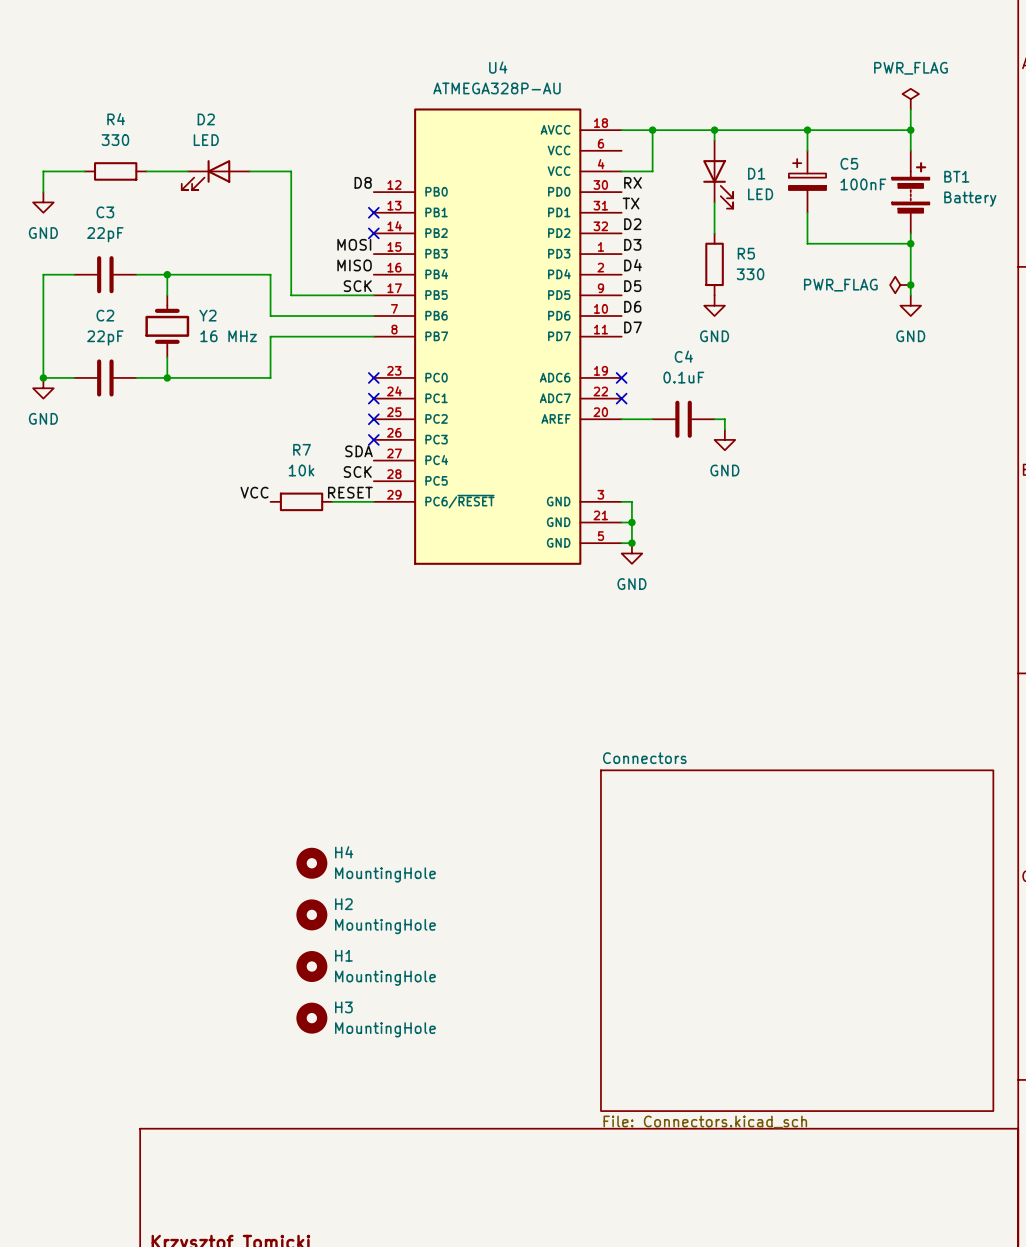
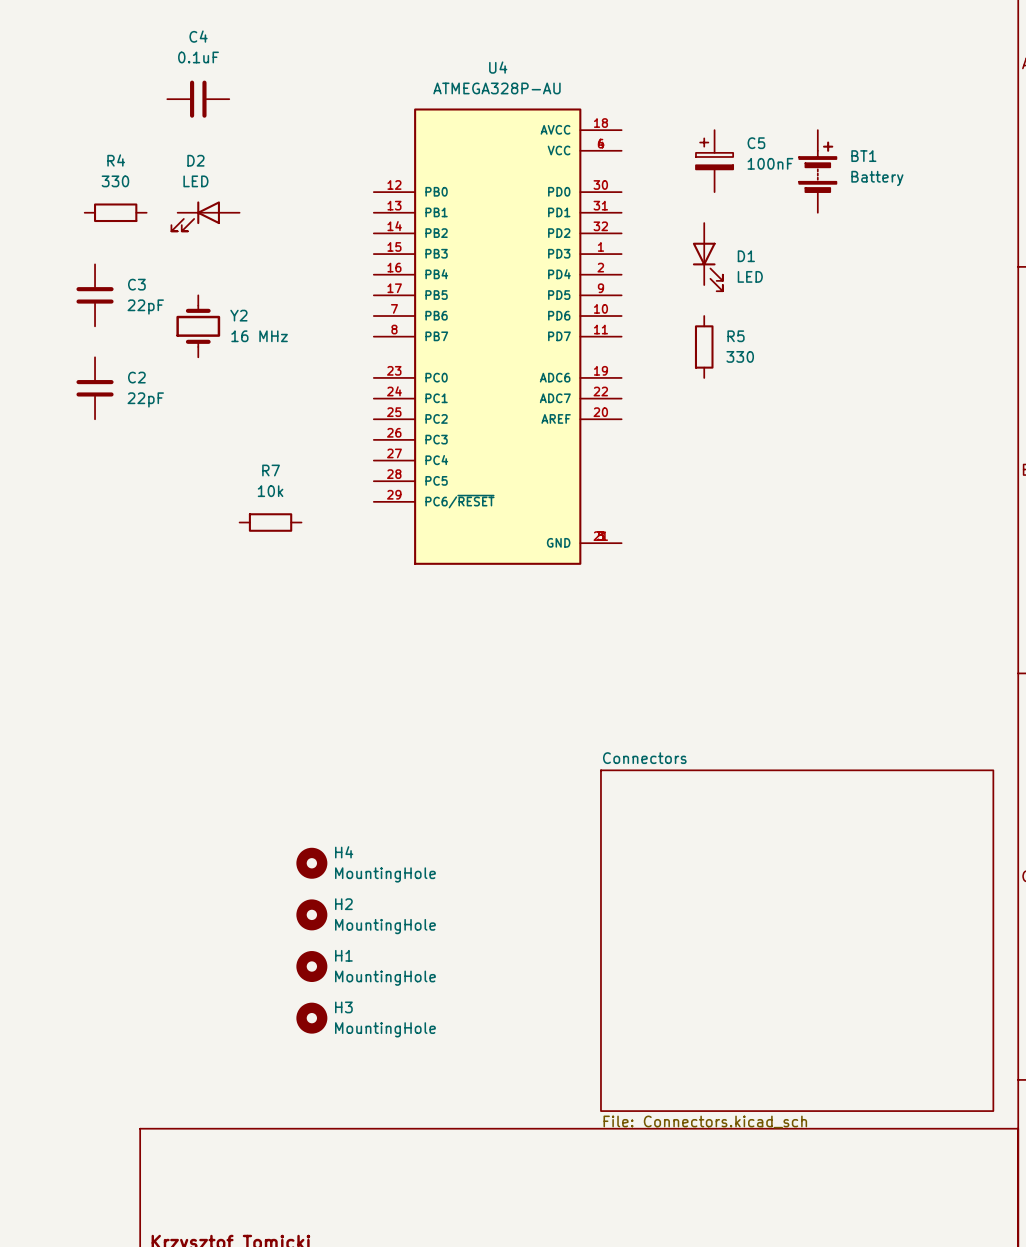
power symbol: PWR_FLAG (910, 99) -> none
U4 symbol: [373, 108, 622, 565] -> [373, 108, 622, 565]
wire: (910, 109) (910, 150) -> none
wire: (621, 130) (910, 130) -> none
wire: (652, 130) (652, 171) (621, 171) -> none
junction: (652, 130) -> none
junction: (714, 130) -> none
wire: (807, 130) (807, 150) -> none
junction: (807, 130) -> none
junction: (910, 130) -> none
wire: (84, 171) (43, 171) (43, 192) -> none
R4 position: (115, 171) -> (115, 212)
wire: (146, 171) (187, 171) -> none
wire: (249, 171) (291, 171) (291, 295) (373, 295) -> none
D1 position: (718, 174) -> (707, 257)
D2 position: (215, 175) -> (205, 216)
C5 position: (807, 181) -> (714, 161)
label: D8 (363, 182) -> none
label: RX (633, 182) -> none
BT1 position: (910, 192) -> (817, 171)
power symbol: GND (43, 202) -> none
wire: (714, 202) (714, 233) -> none
label: TX (631, 203) -> none
C3 name position: C3 (105, 212) -> C3 (136, 284)
no-connect mark: (373, 212) -> none
wire: (807, 212) (807, 243) (910, 243) -> none
label: D2 (632, 224) -> none
no-connect mark: (373, 233) -> none
wire: (910, 233) (910, 295) -> none
junction: (910, 243) -> none
label: MOSI (354, 244) -> none
label: D3 (632, 244) -> none
R5 position: (714, 264) -> (704, 346)
label: MISO (354, 265) -> none
label: D4 (633, 265) -> none
wire: (74, 274) (43, 274) (43, 377) (74, 377) -> none
C3 rotation: 0° (105, 274) -> 90° clockwise (95, 295)
wire: (136, 274) (270, 274) (270, 316) (373, 316) -> none
wire: (167, 274) (167, 295) -> none
junction: (167, 274) -> none
power symbol: PWR_FLAG (900, 285) -> none
junction: (910, 285) -> none
label: SCK (357, 286) -> none
label: D5 (632, 286) -> none
power symbol: GND (714, 305) -> none
power symbol: GND (910, 305) -> none
label: D6 (632, 306) -> none
C2 name position: C2 (105, 315) -> C2 (136, 377)
Y2 position: (167, 326) -> (198, 326)
label: D7 (633, 327) -> none
wire: (373, 336) (270, 336) (270, 377) (136, 377) -> none
wire: (167, 357) (167, 377) -> none
junction: (43, 377) -> none
C2 rotation: 0° (105, 377) -> 90° clockwise (95, 388)
junction: (167, 377) -> none
no-connect mark: (373, 377) -> none
no-connect mark: (621, 377) -> none
power symbol: GND (43, 388) -> none
no-connect mark: (373, 398) -> none
no-connect mark: (621, 398) -> none
no-connect mark: (373, 419) -> none
wire: (621, 419) (652, 419) -> none
C4 position: (683, 419) -> (198, 99)
wire: (714, 419) (724, 419) (724, 429) -> none
no-connect mark: (373, 439) -> none
power symbol: GND (724, 439) -> none
label: SDA (358, 451) -> none
label: SCK (357, 472) -> none
label: VCC (254, 492) -> none
label: RESET (350, 492) -> none
R7 position: (301, 501) -> (270, 522)
wire: (332, 501) (373, 501) -> none
wire: (621, 501) (631, 501) (631, 543) (621, 543) -> none
wire: (621, 522) (631, 522) -> none
junction: (631, 522) -> none
junction: (631, 543) -> none
power symbol: GND (631, 553) -> none

